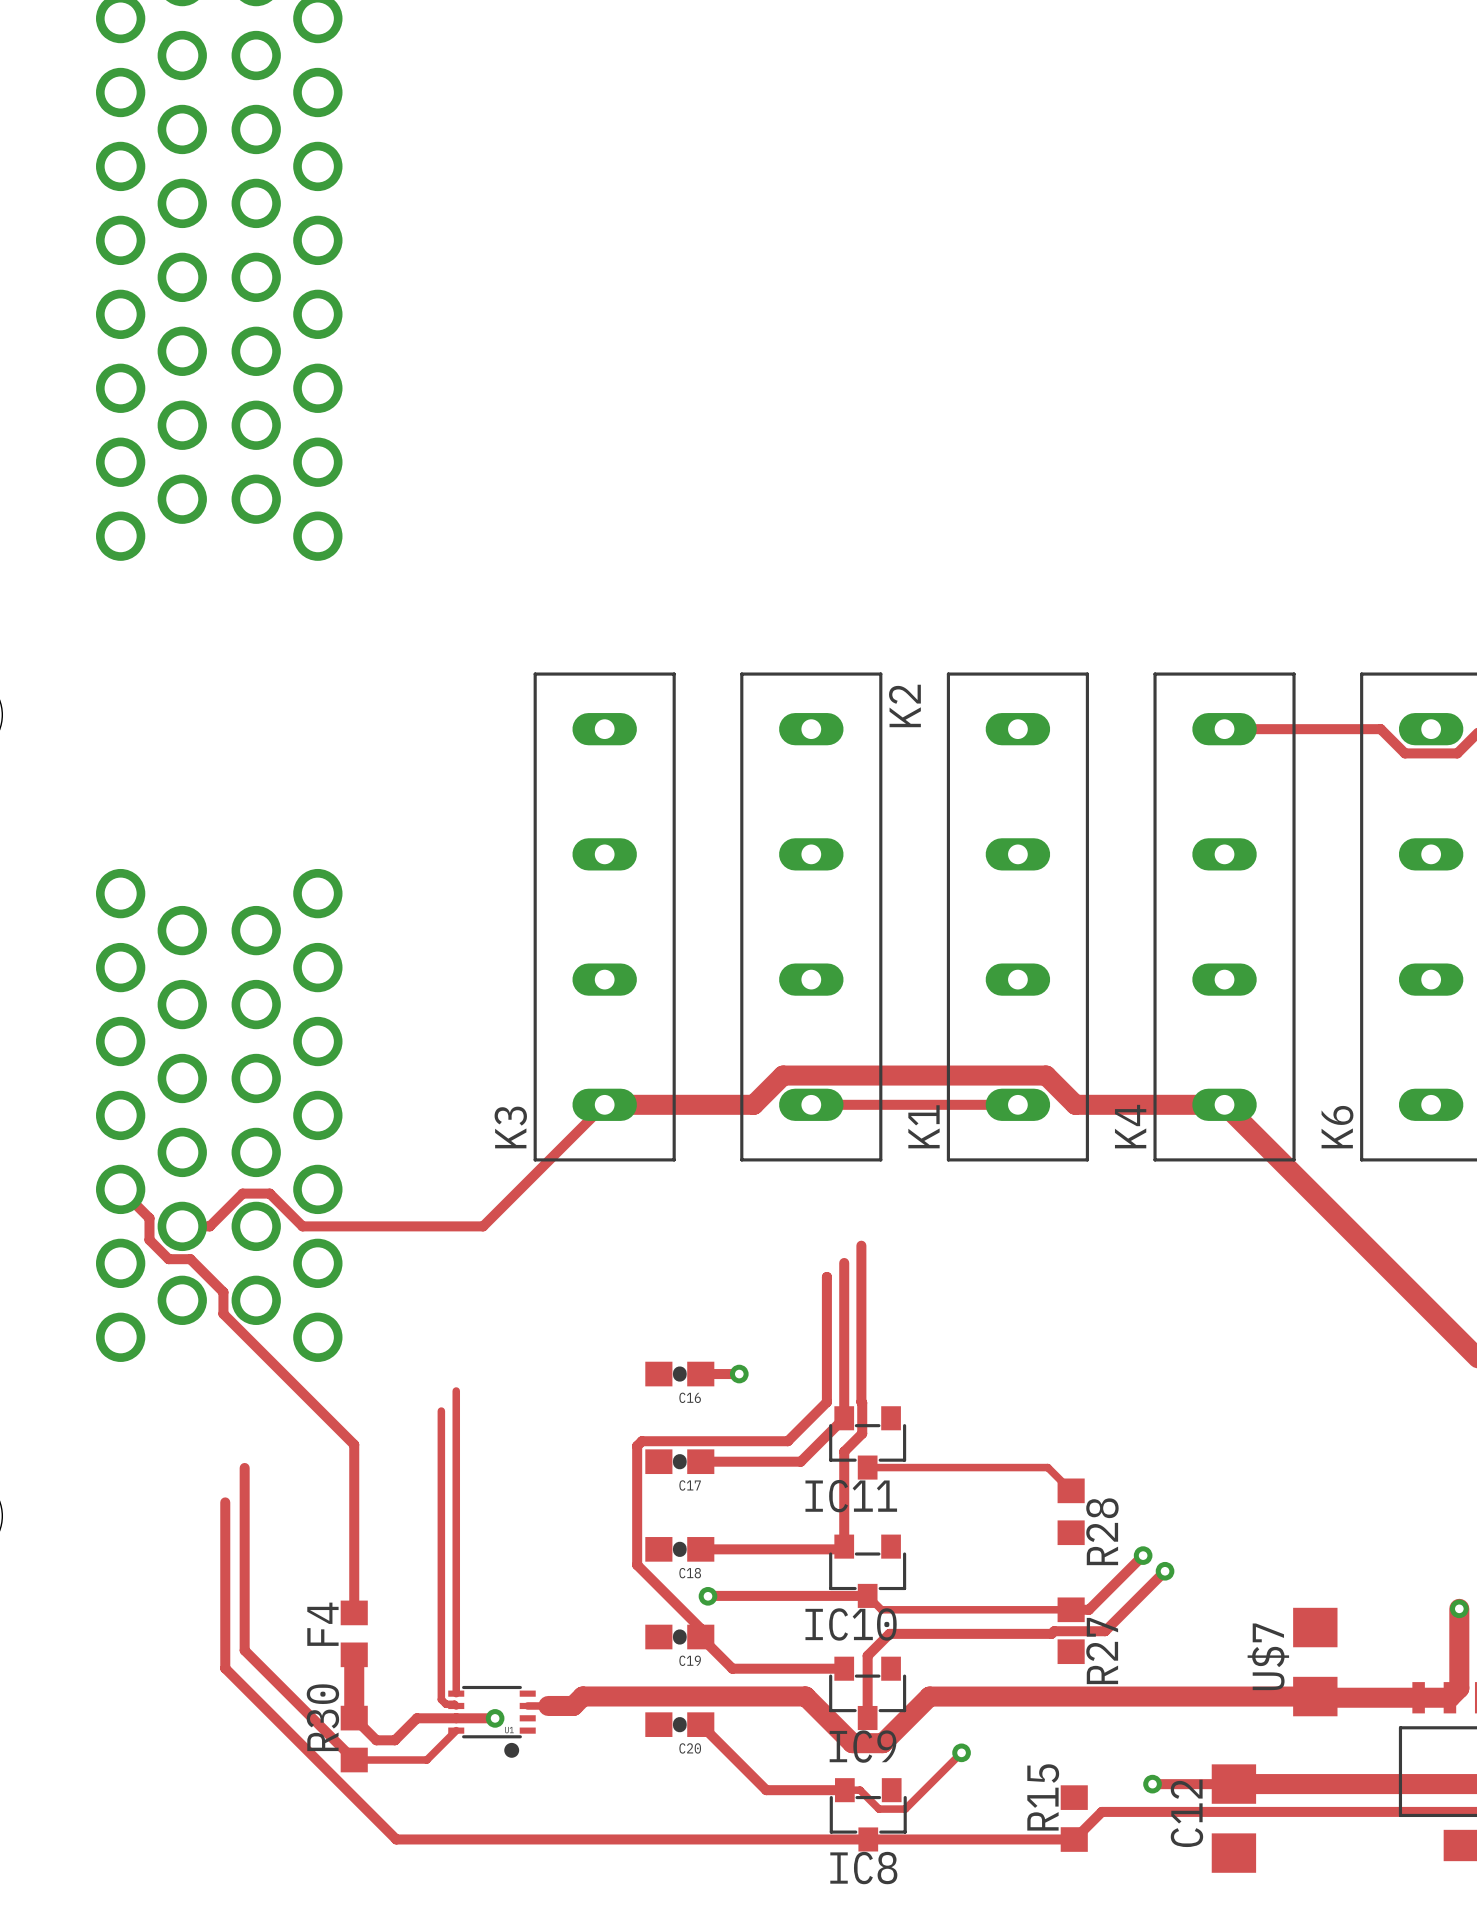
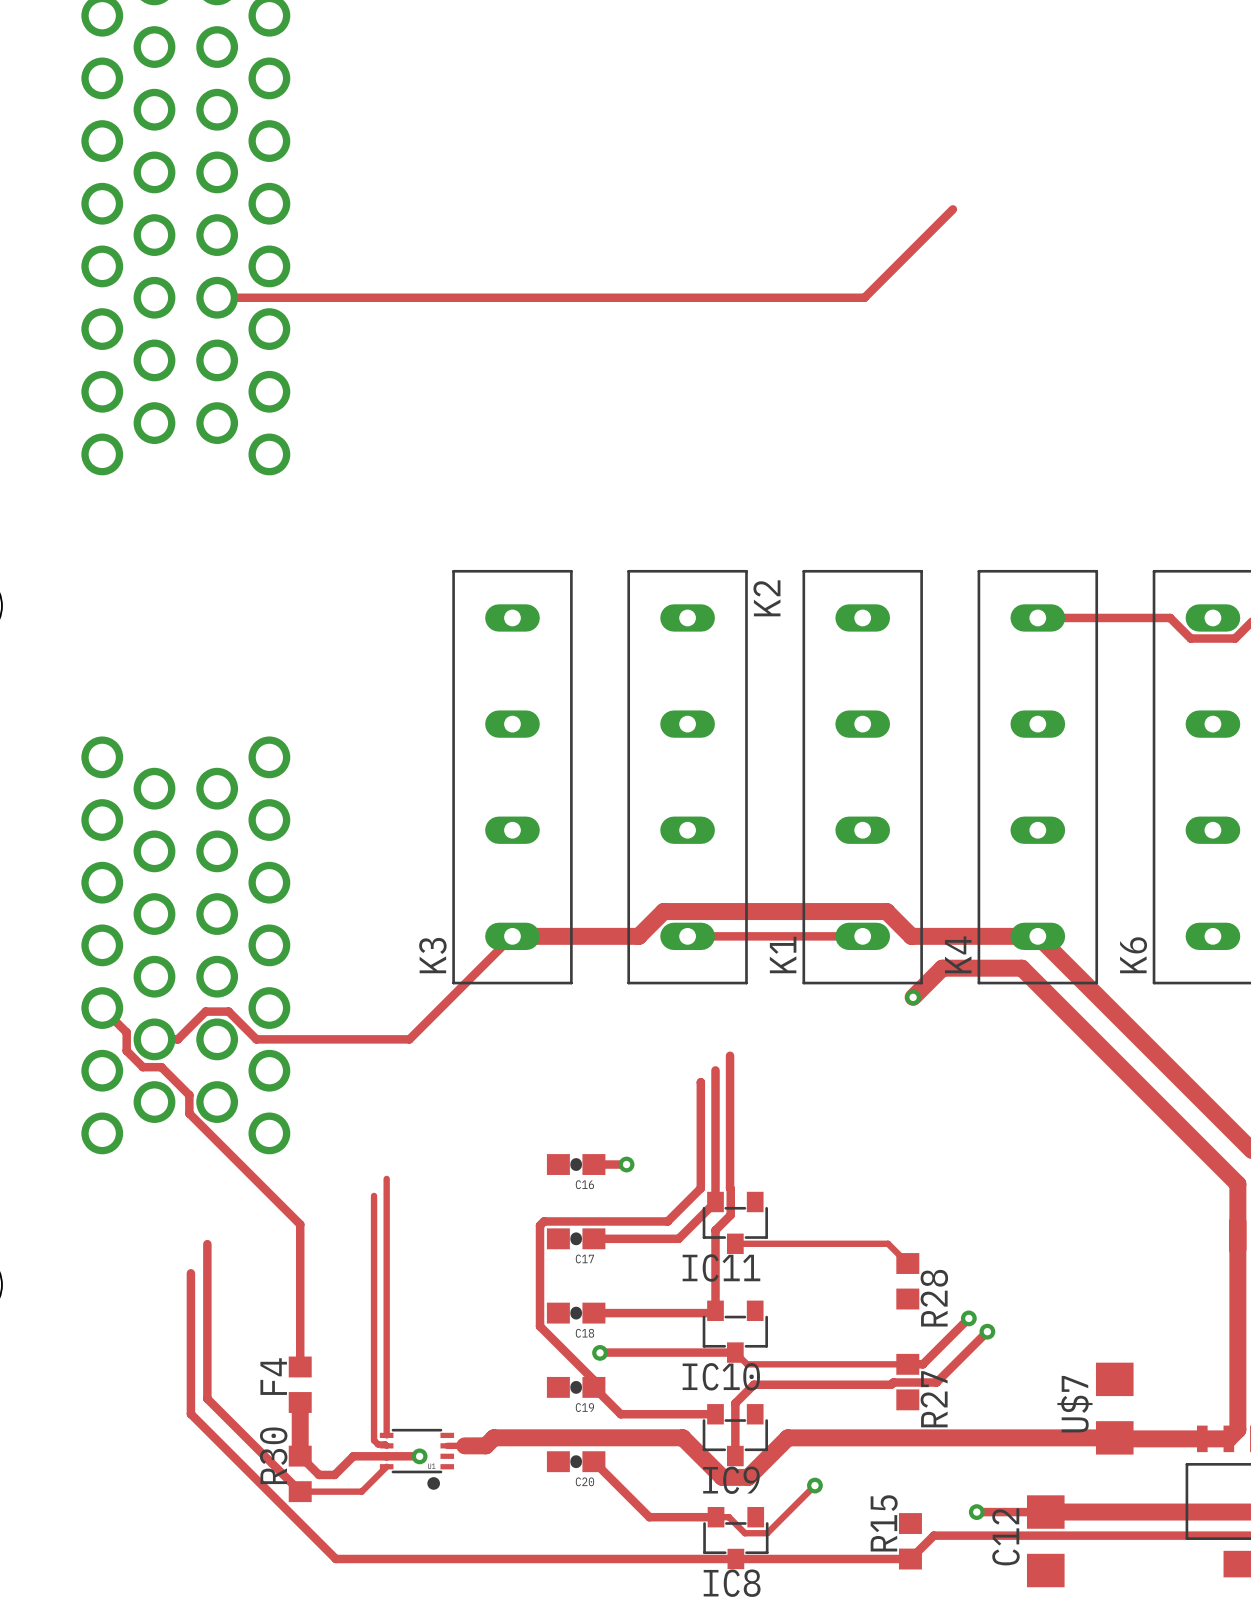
track: none -> (952, 209) (864, 297) (217, 297)
via: none -> (913, 997)
track: (1459, 1608) (1459, 1688) -> (913, 997) (942, 968) (1021, 968) (1237, 1184) (1236, 1430)
via: (1459, 1608) -> none

